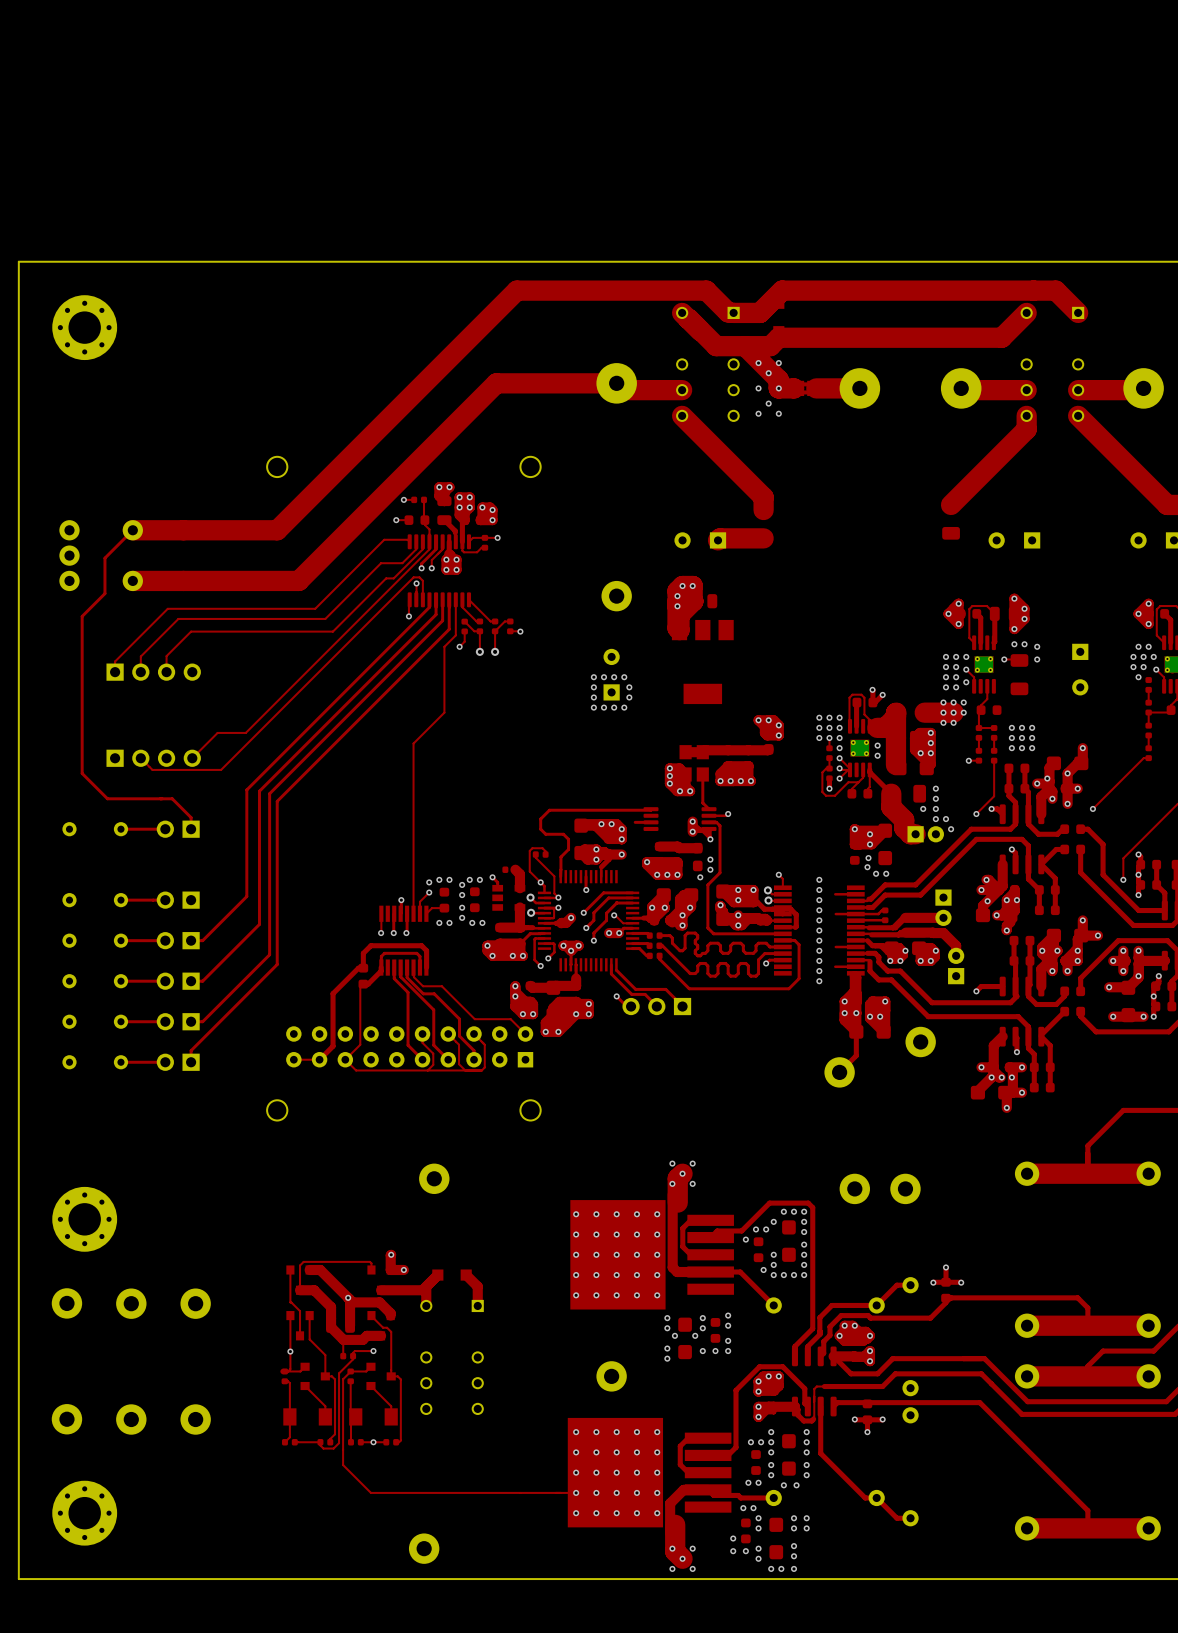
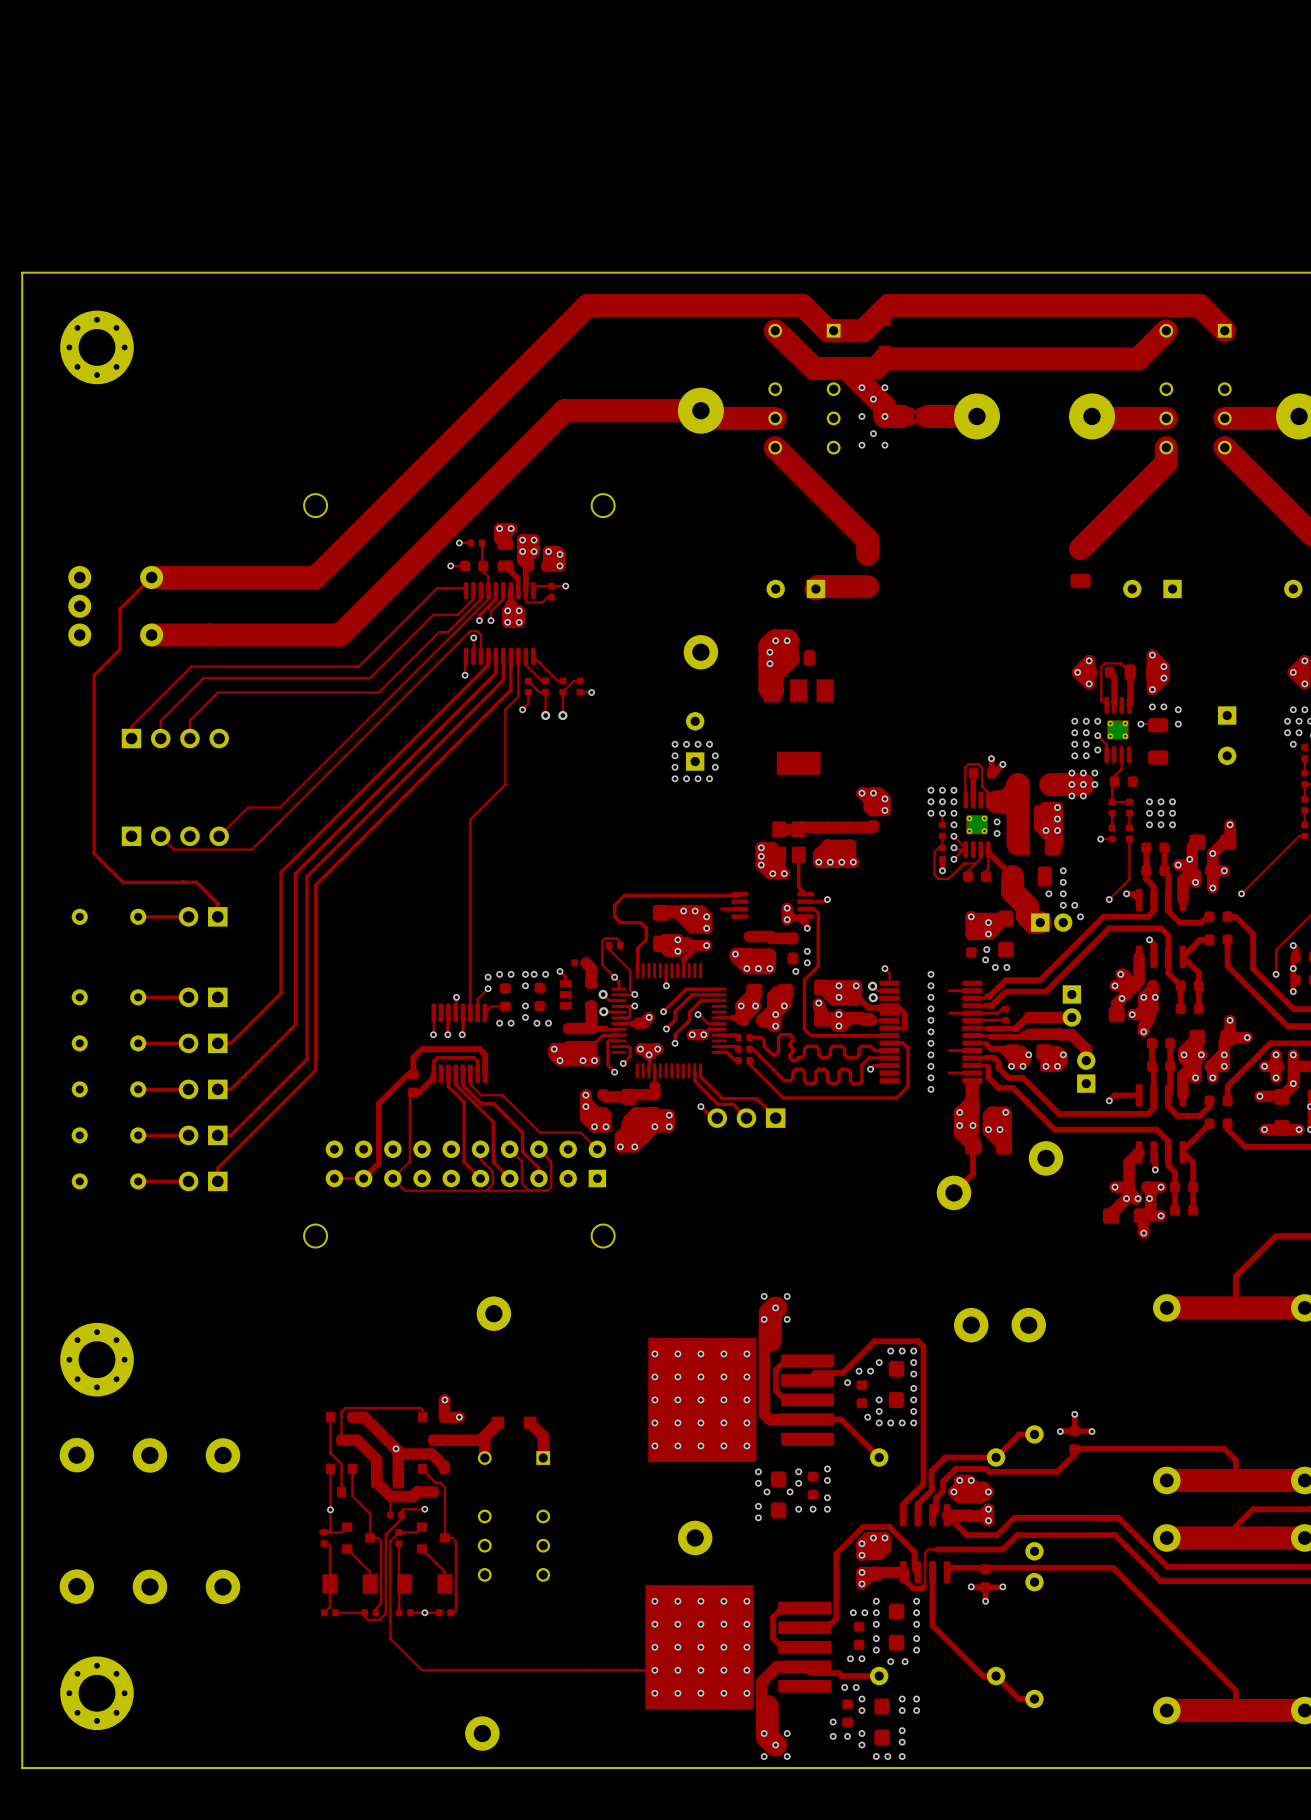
via: none -> (525, 974)
via: (462, 884) -> none
via: none -> (525, 985)
via: (462, 895) -> none

